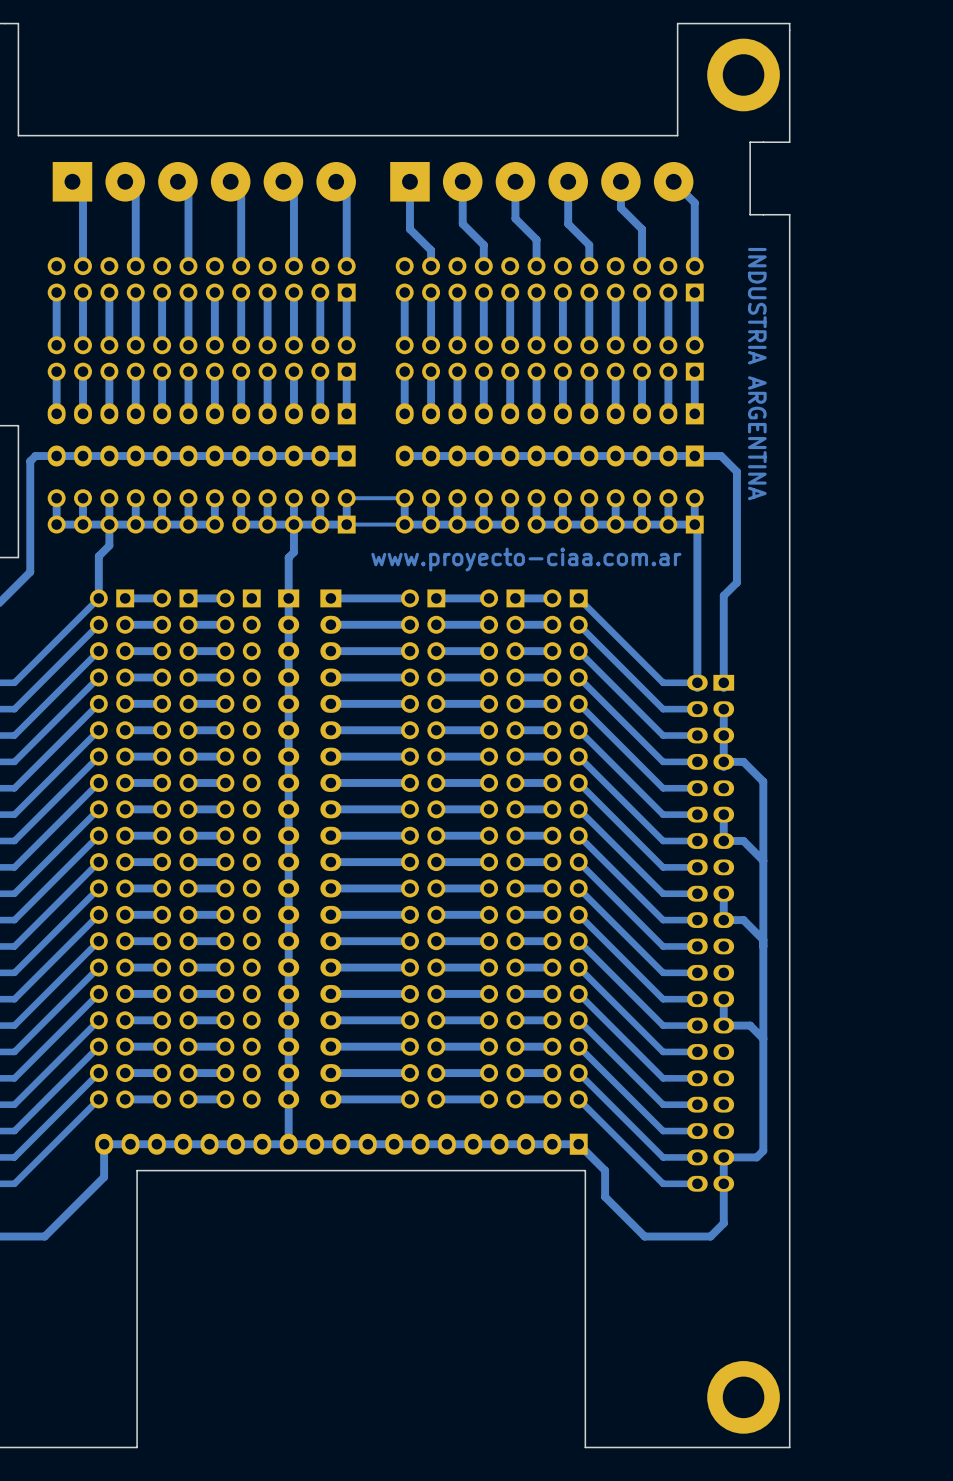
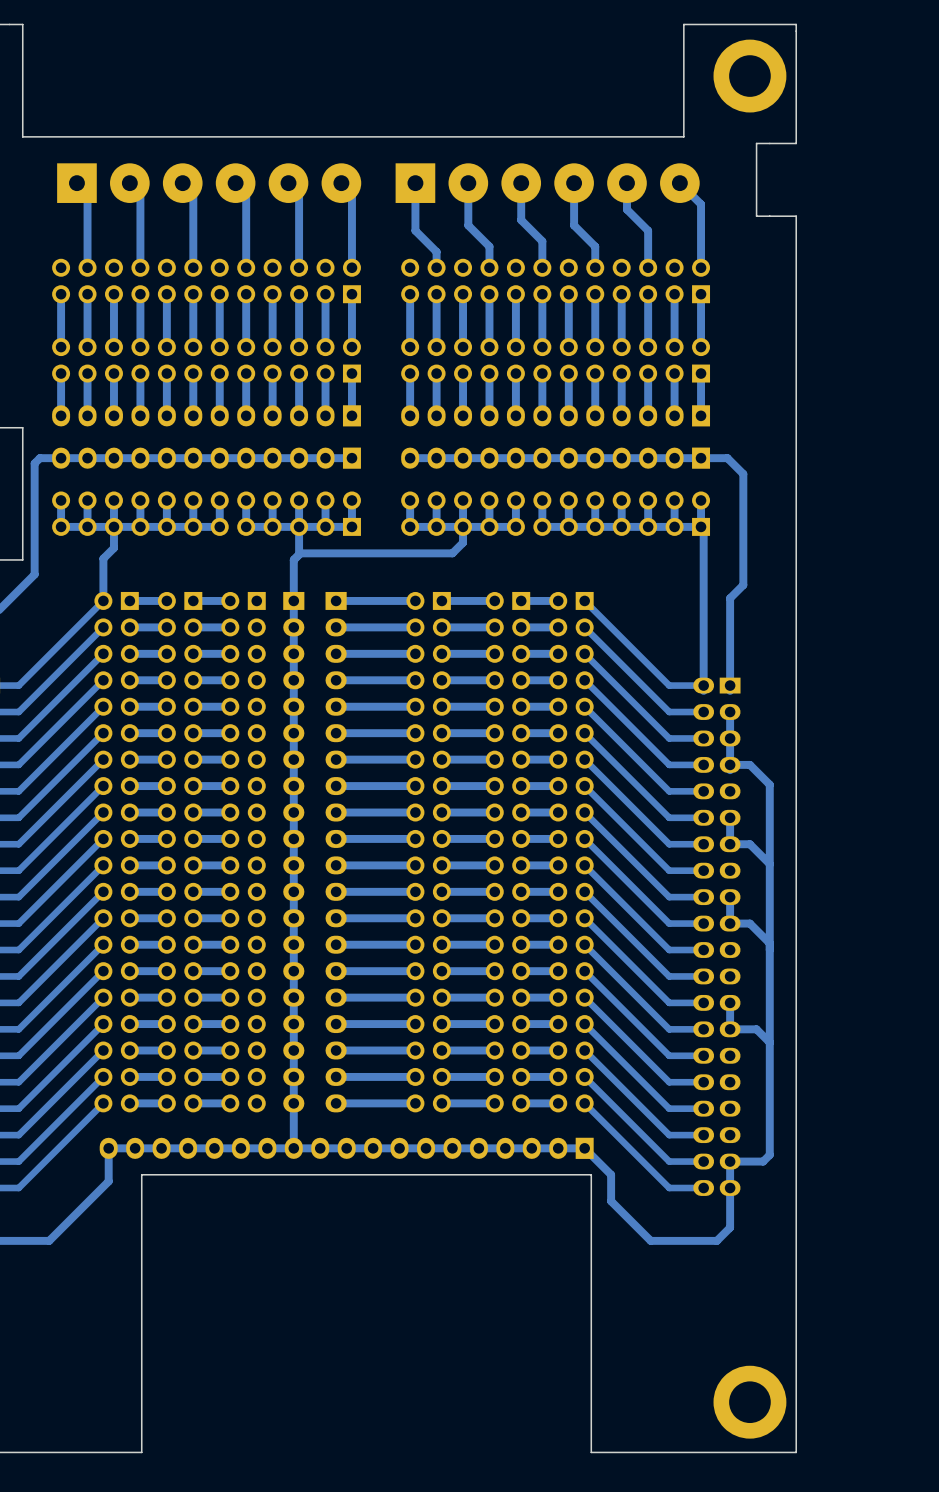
text: INDUSTRIA ARGENTINA (757, 374) -> none
track: (404, 498) (346, 498) -> none
track: (404, 524) (346, 524) -> none
track: none -> (463, 526) (463, 542) (452, 553) (299, 554)
text: www.proyecto-ciaa.com.ar (526, 559) -> none

